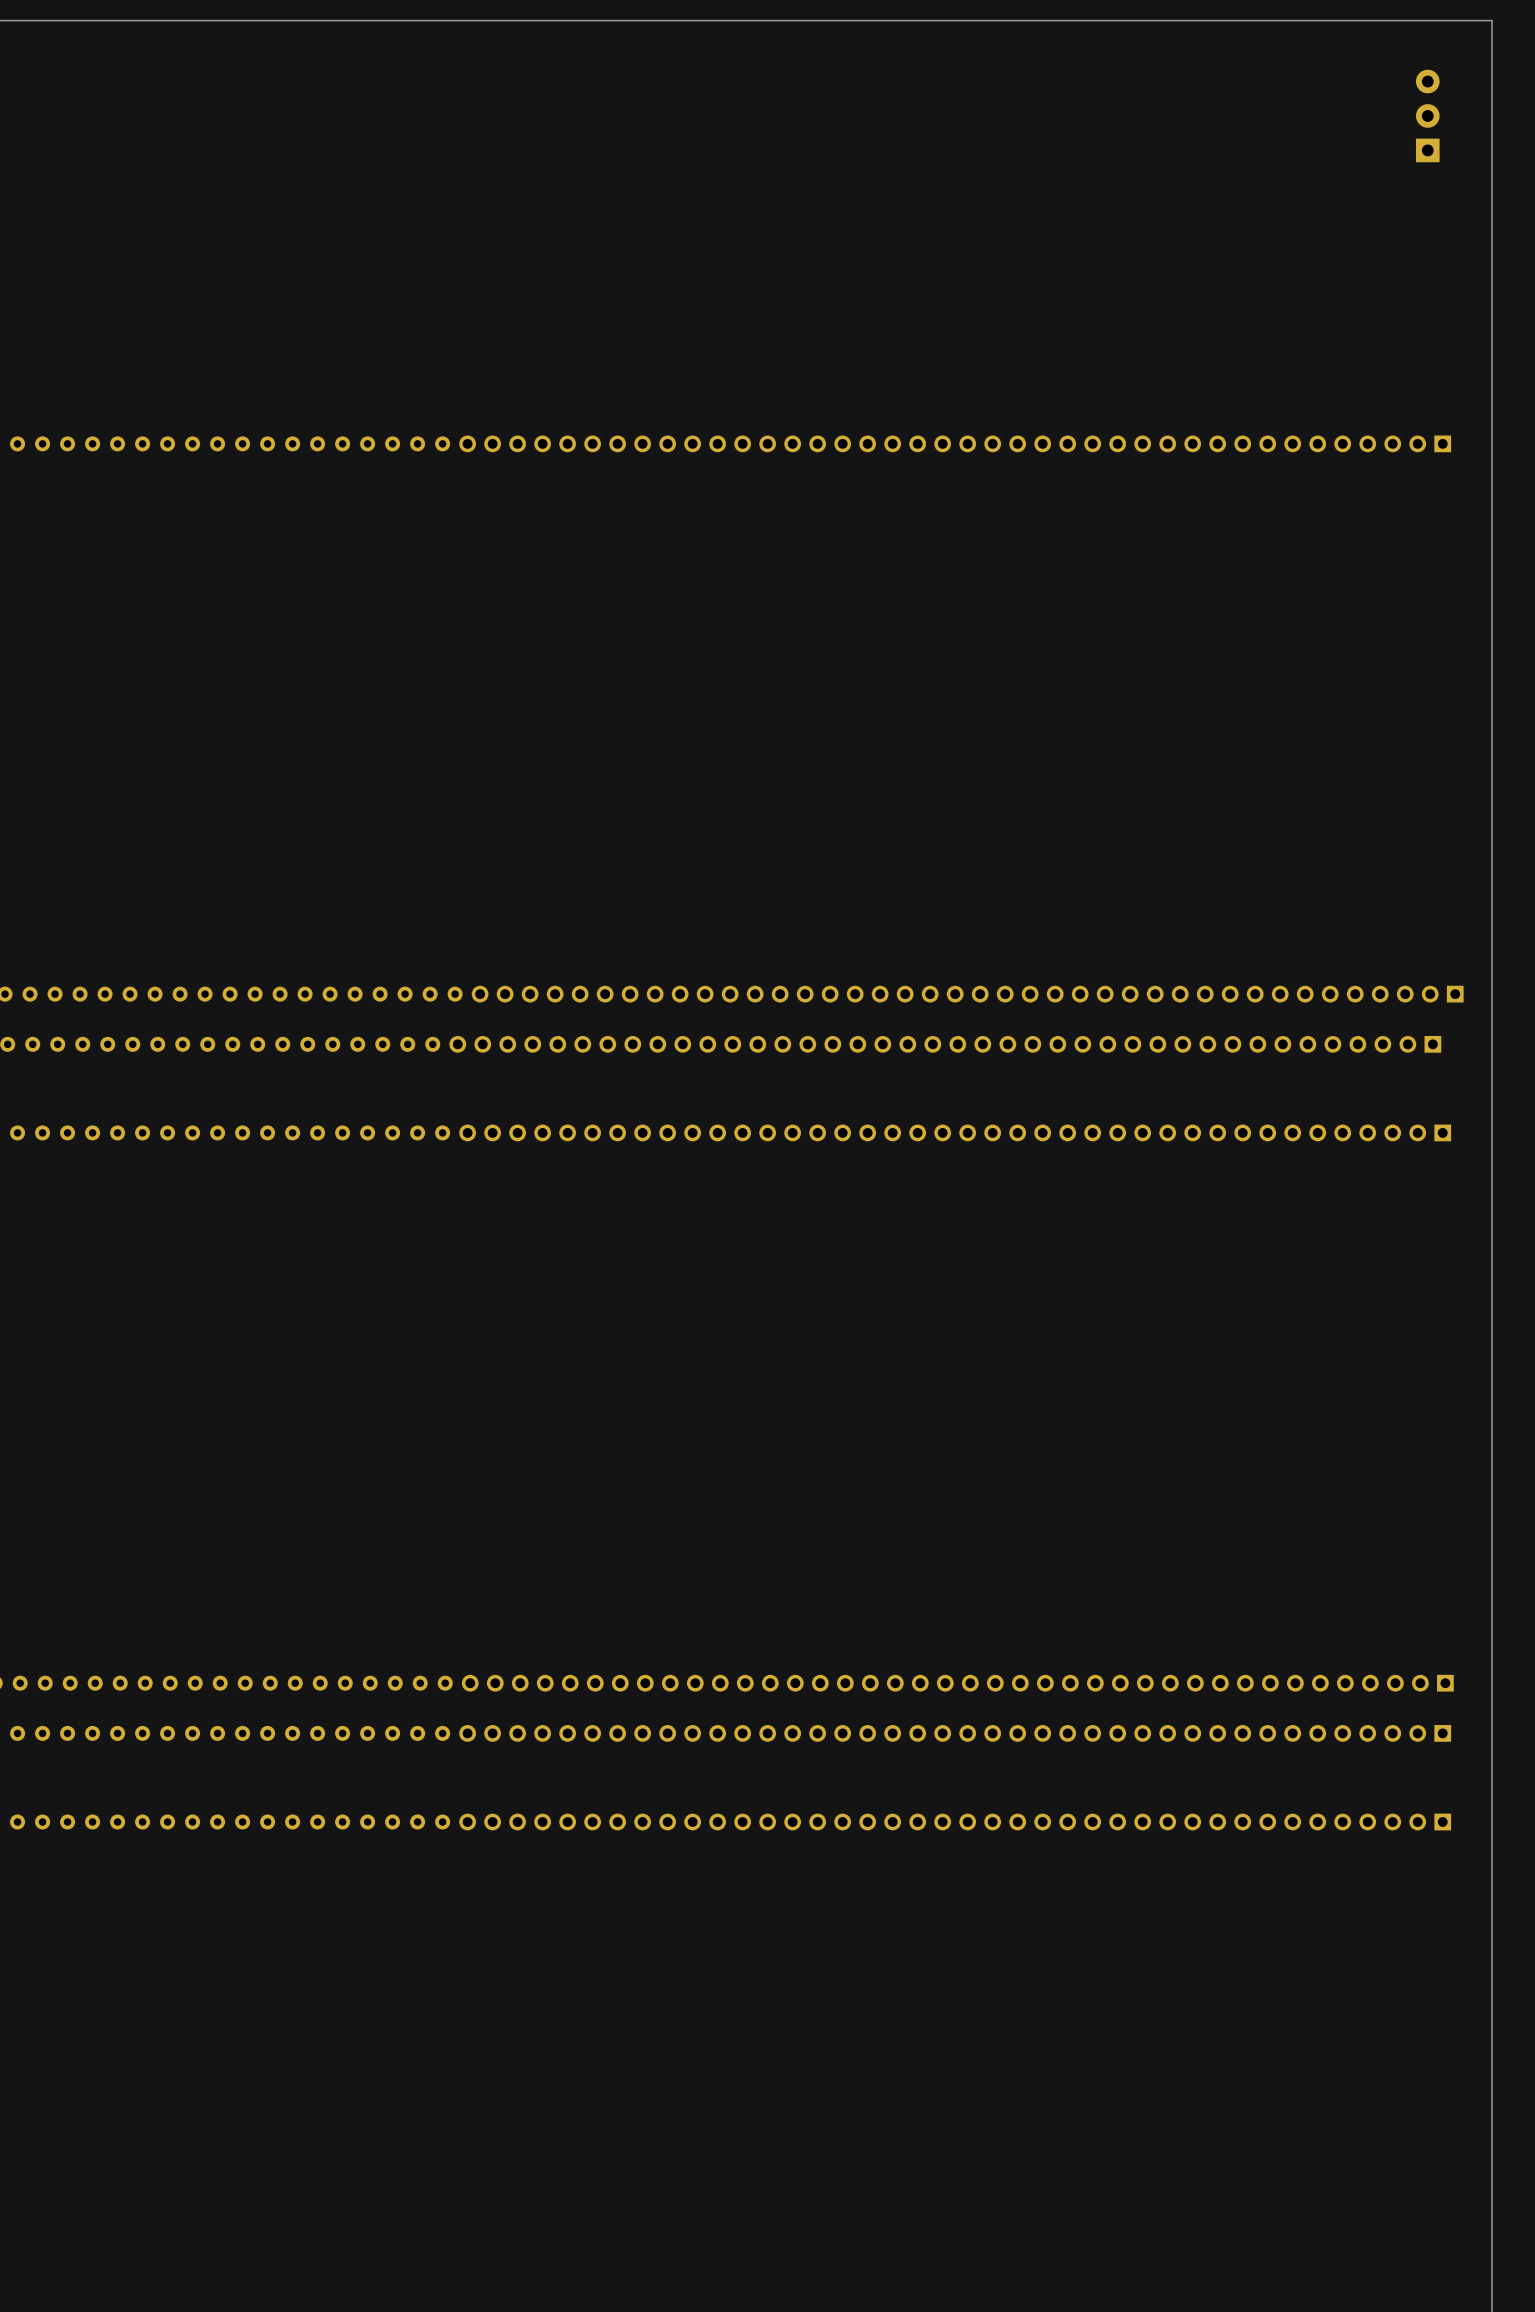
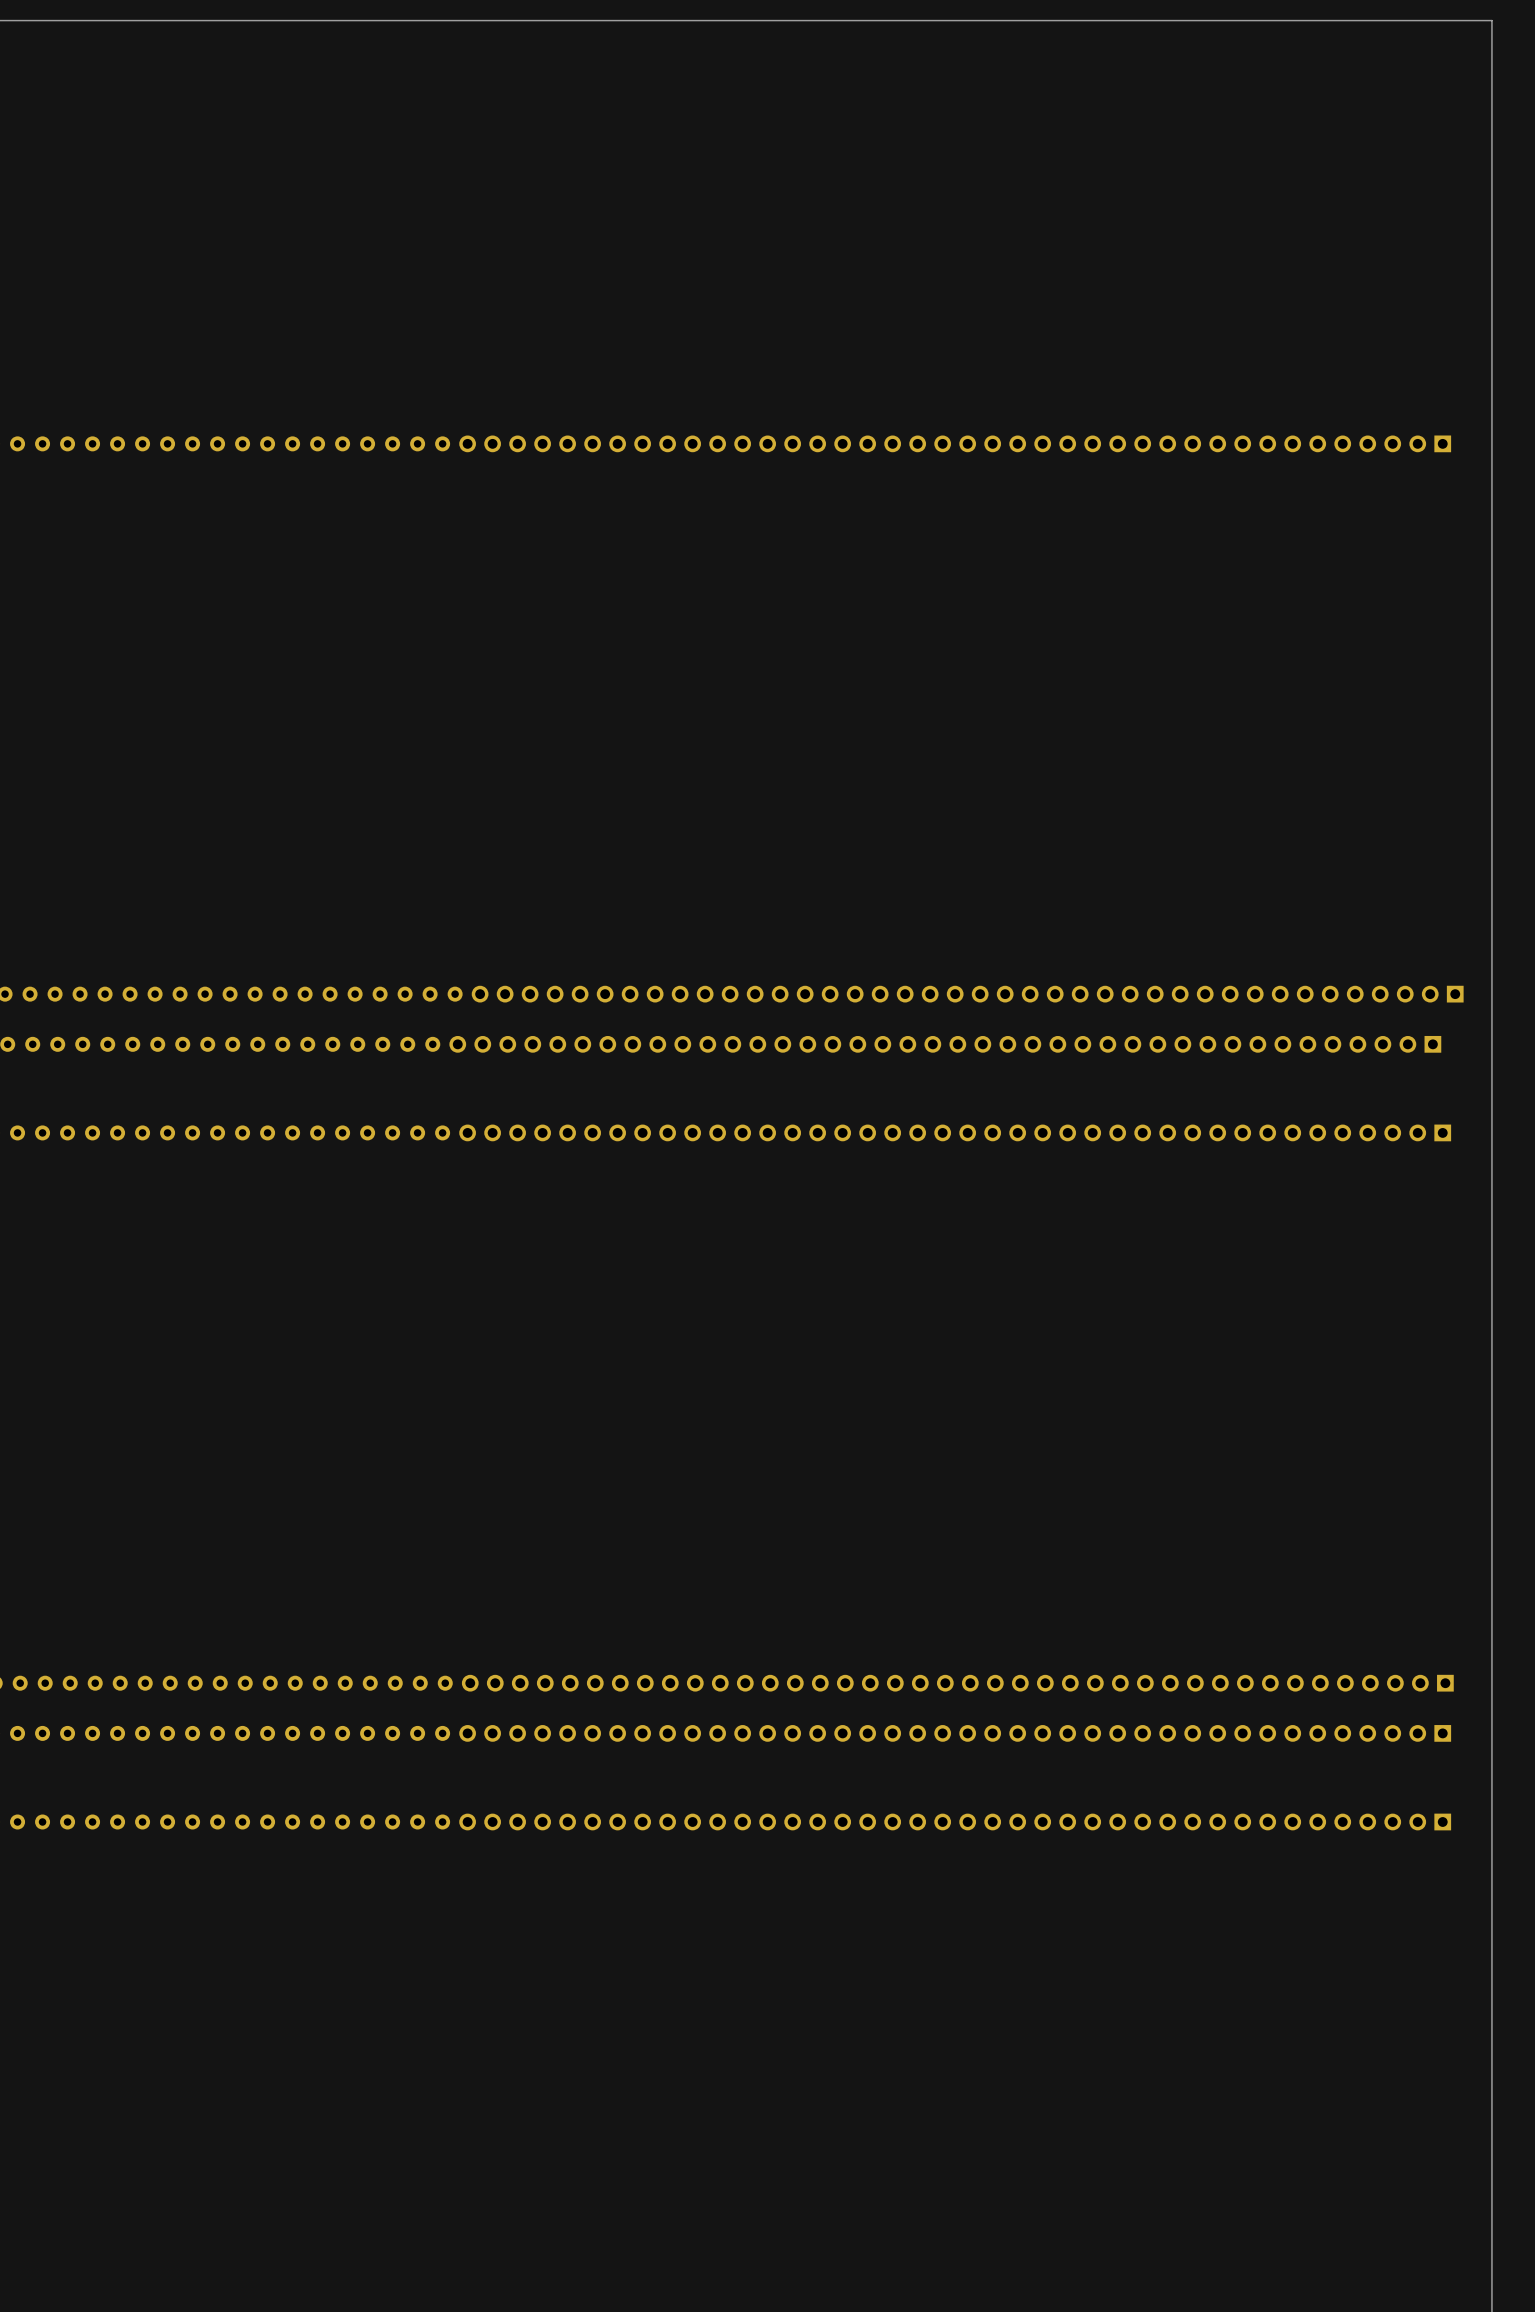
part: (1427, 115) -> none

